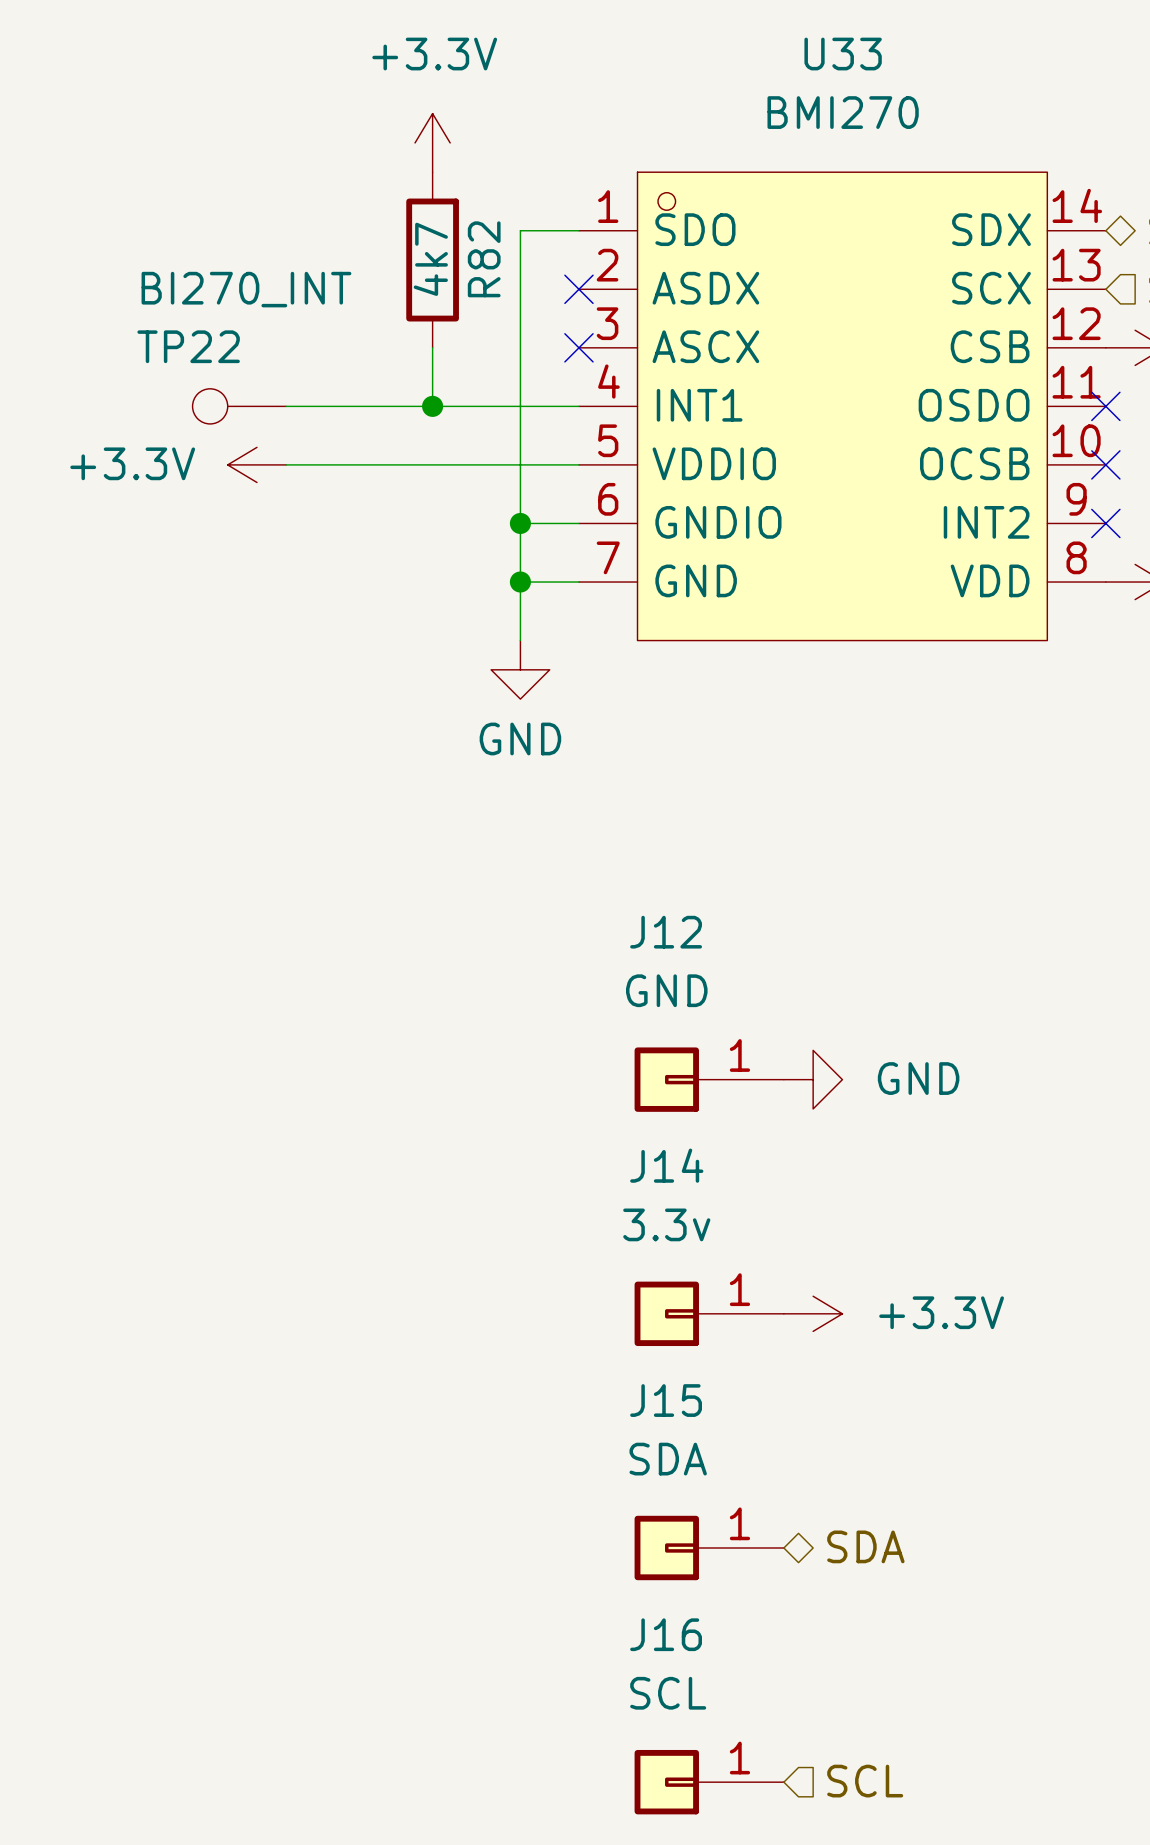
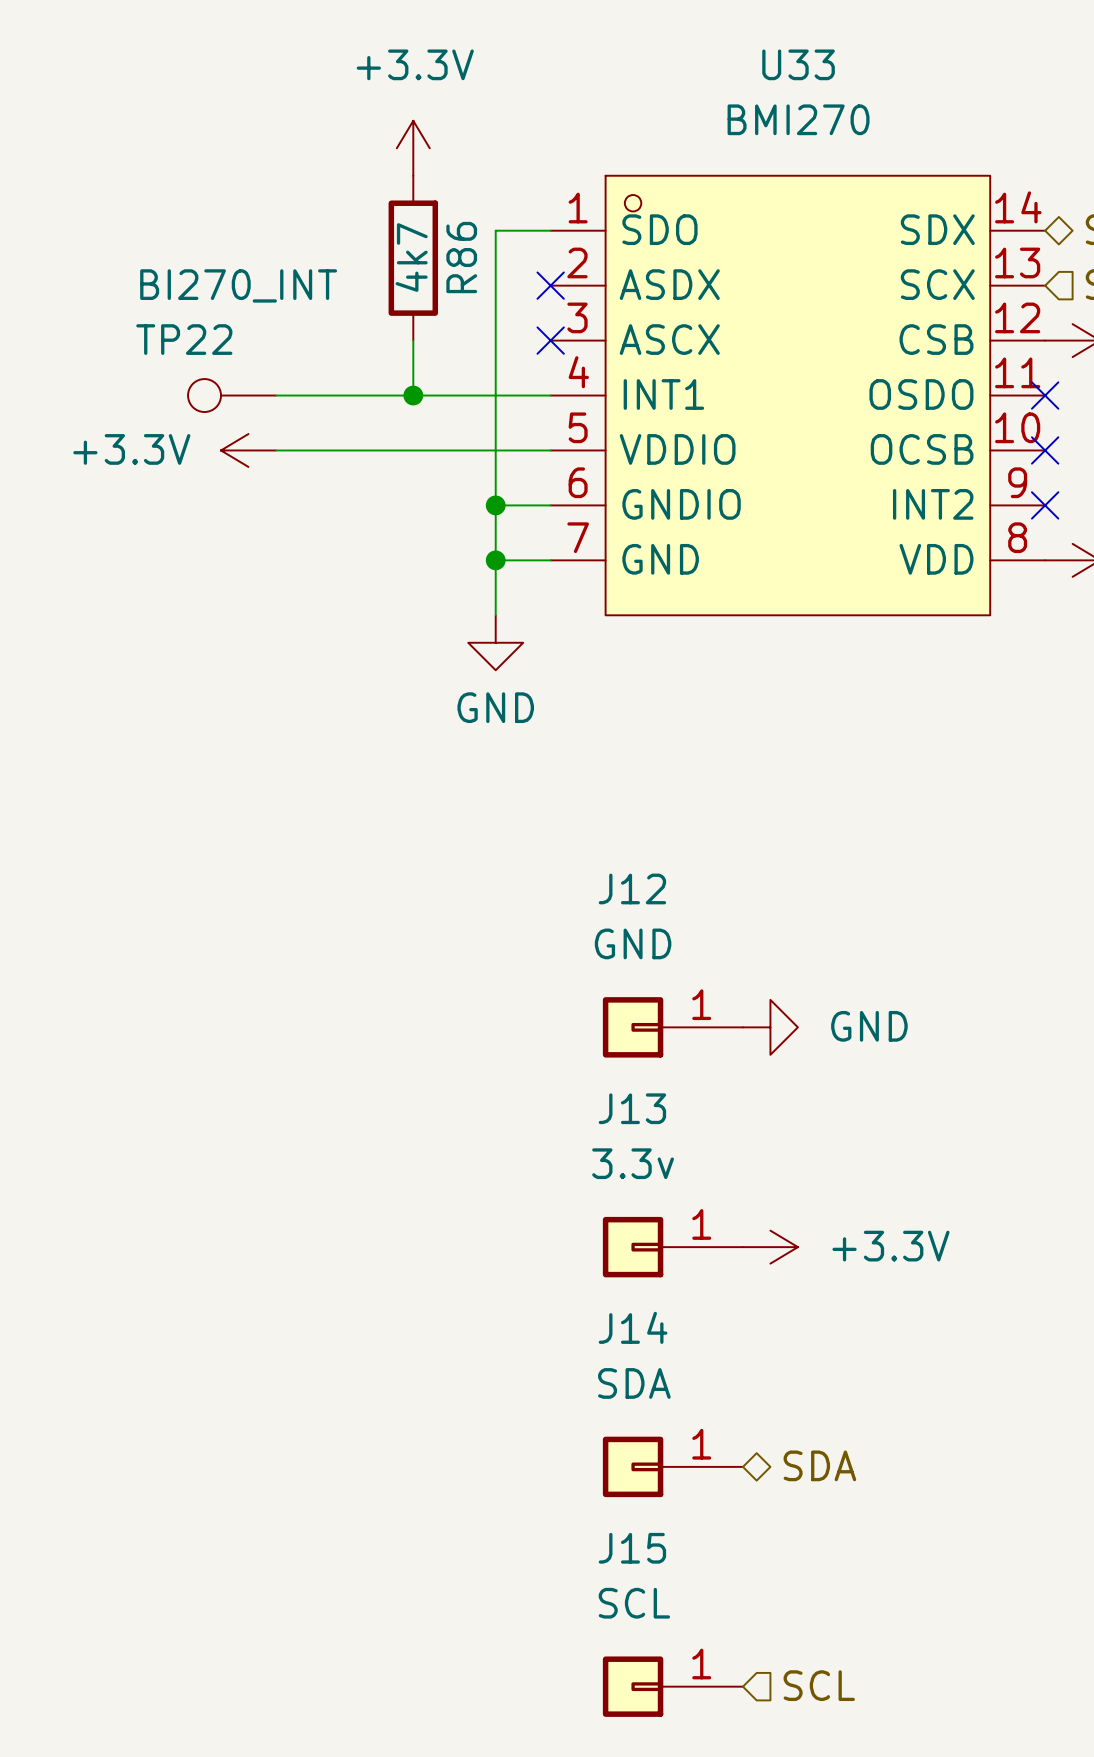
R82 name: R82 (484, 259) -> R86 (461, 257)
J14 name: J14 (666, 1165) -> J13 (632, 1108)
J15 name: J15 (666, 1400) -> J14 (633, 1327)
J16 name: J16 (666, 1634) -> J15 (632, 1548)

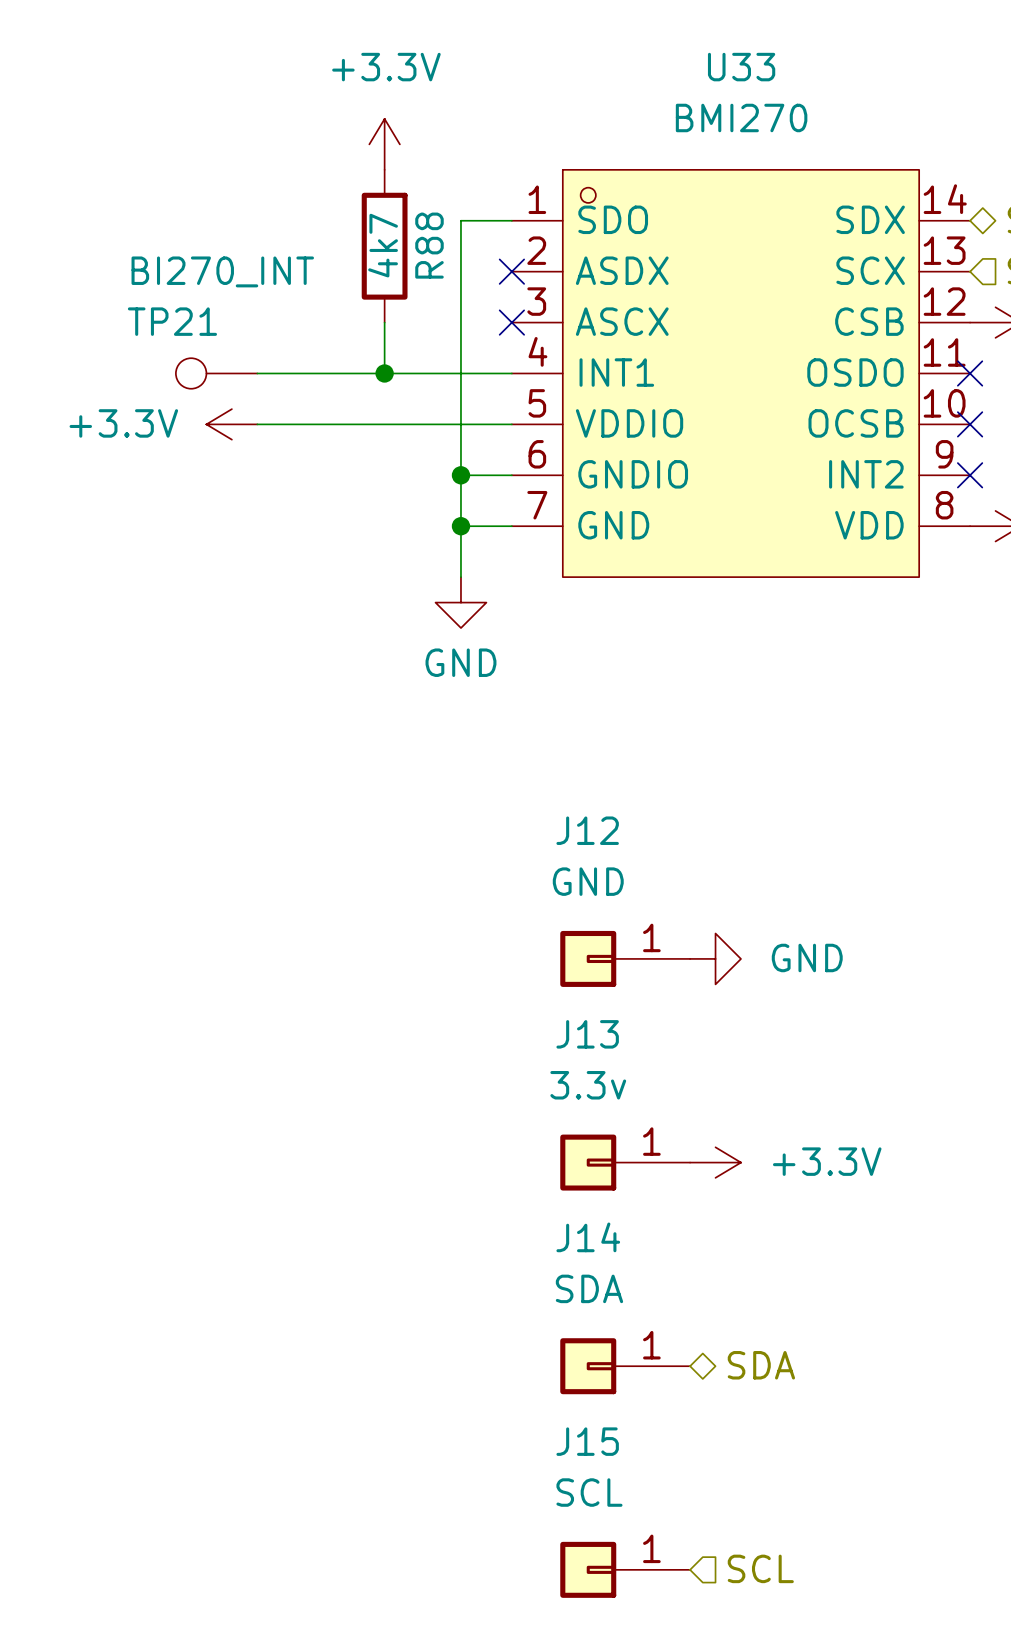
R86 name: R86 (461, 257) -> R88 (429, 245)
TP22 name: TP22 (184, 339) -> TP21 (172, 321)

